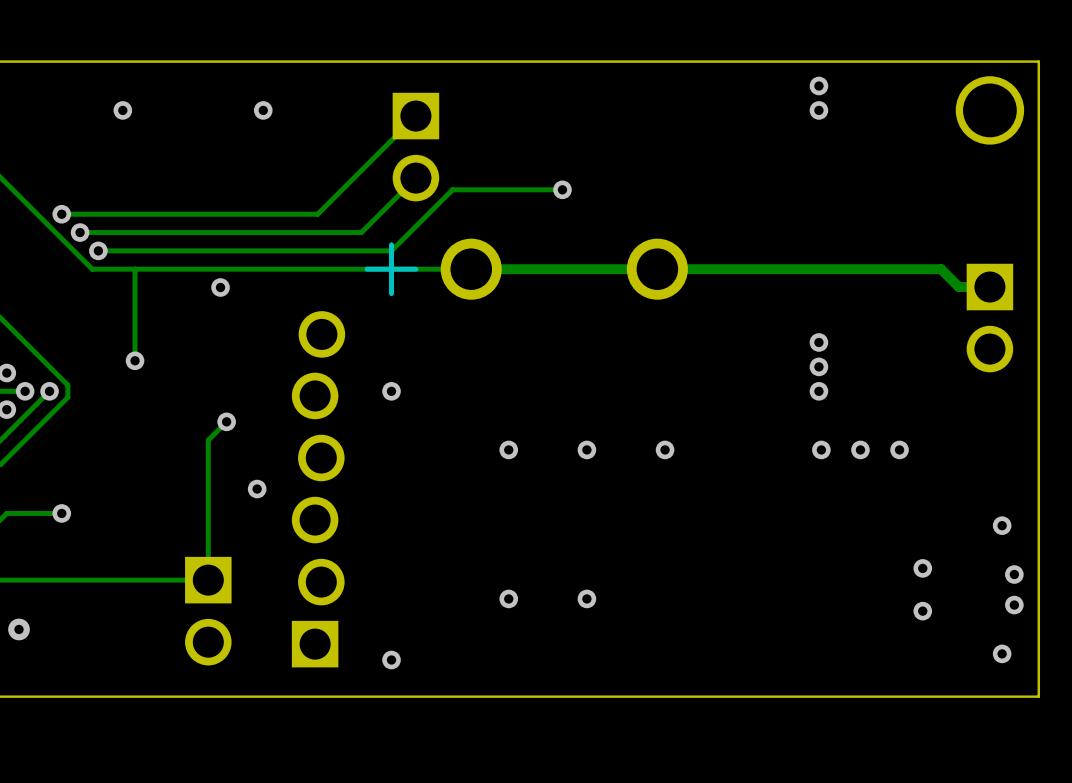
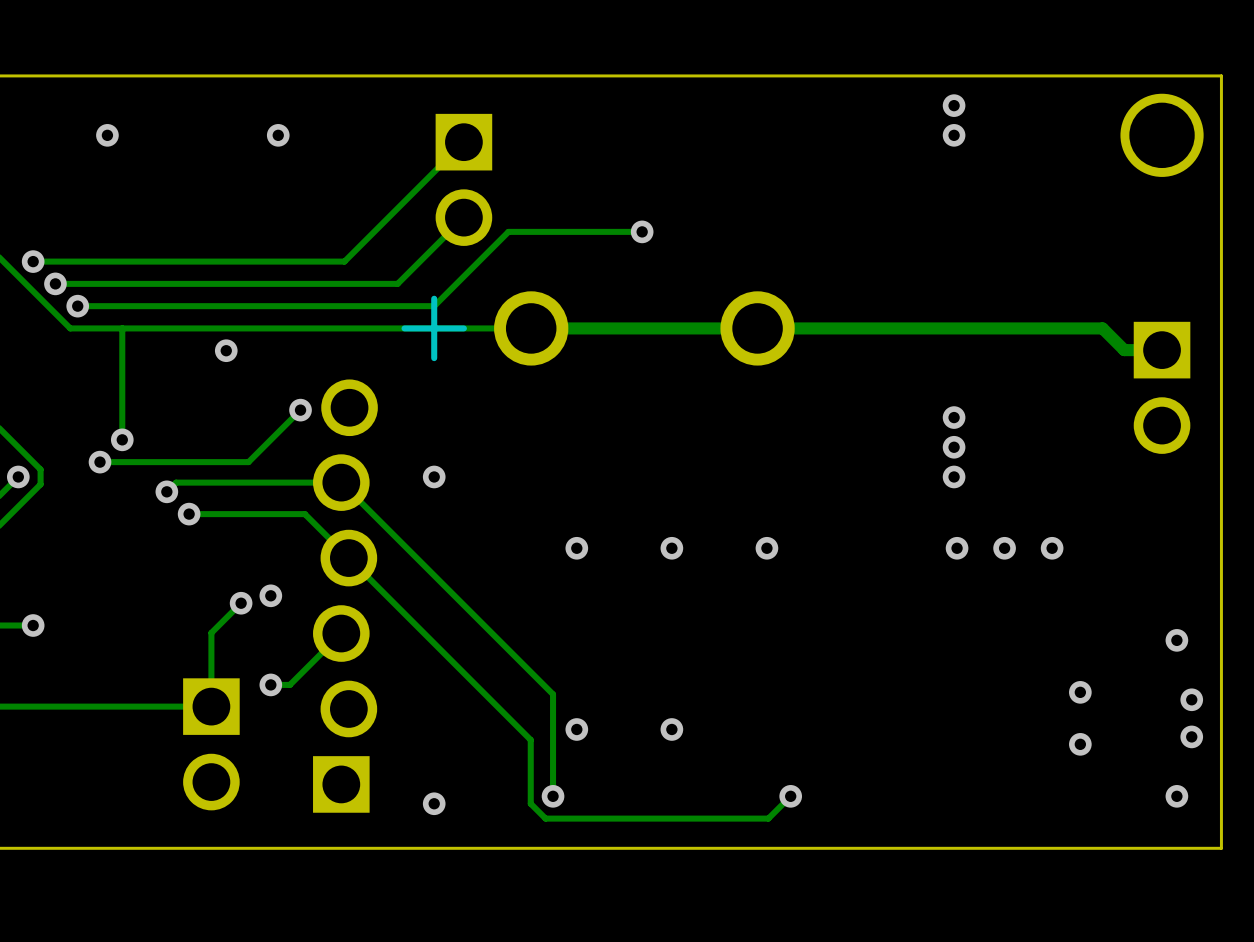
track: none -> (300, 410) (248, 462) (100, 462)
via: none -> (300, 410)
via: none -> (100, 462)
track: none -> (166, 491) (176, 482) (341, 482) (553, 694) (553, 796)
via: none -> (166, 491)
track: none -> (189, 514) (304, 514) (530, 739) (530, 803) (545, 818) (768, 818) (790, 796)
via: none -> (189, 514)
track: (226, 421) (208, 440) (208, 519) -> (241, 603) (211, 632)
via: (226, 421) -> none
via: none -> (241, 603)
track: none -> (341, 633) (289, 684) (270, 684)
via: none -> (270, 684)
via: none -> (553, 796)
via: none -> (790, 796)

